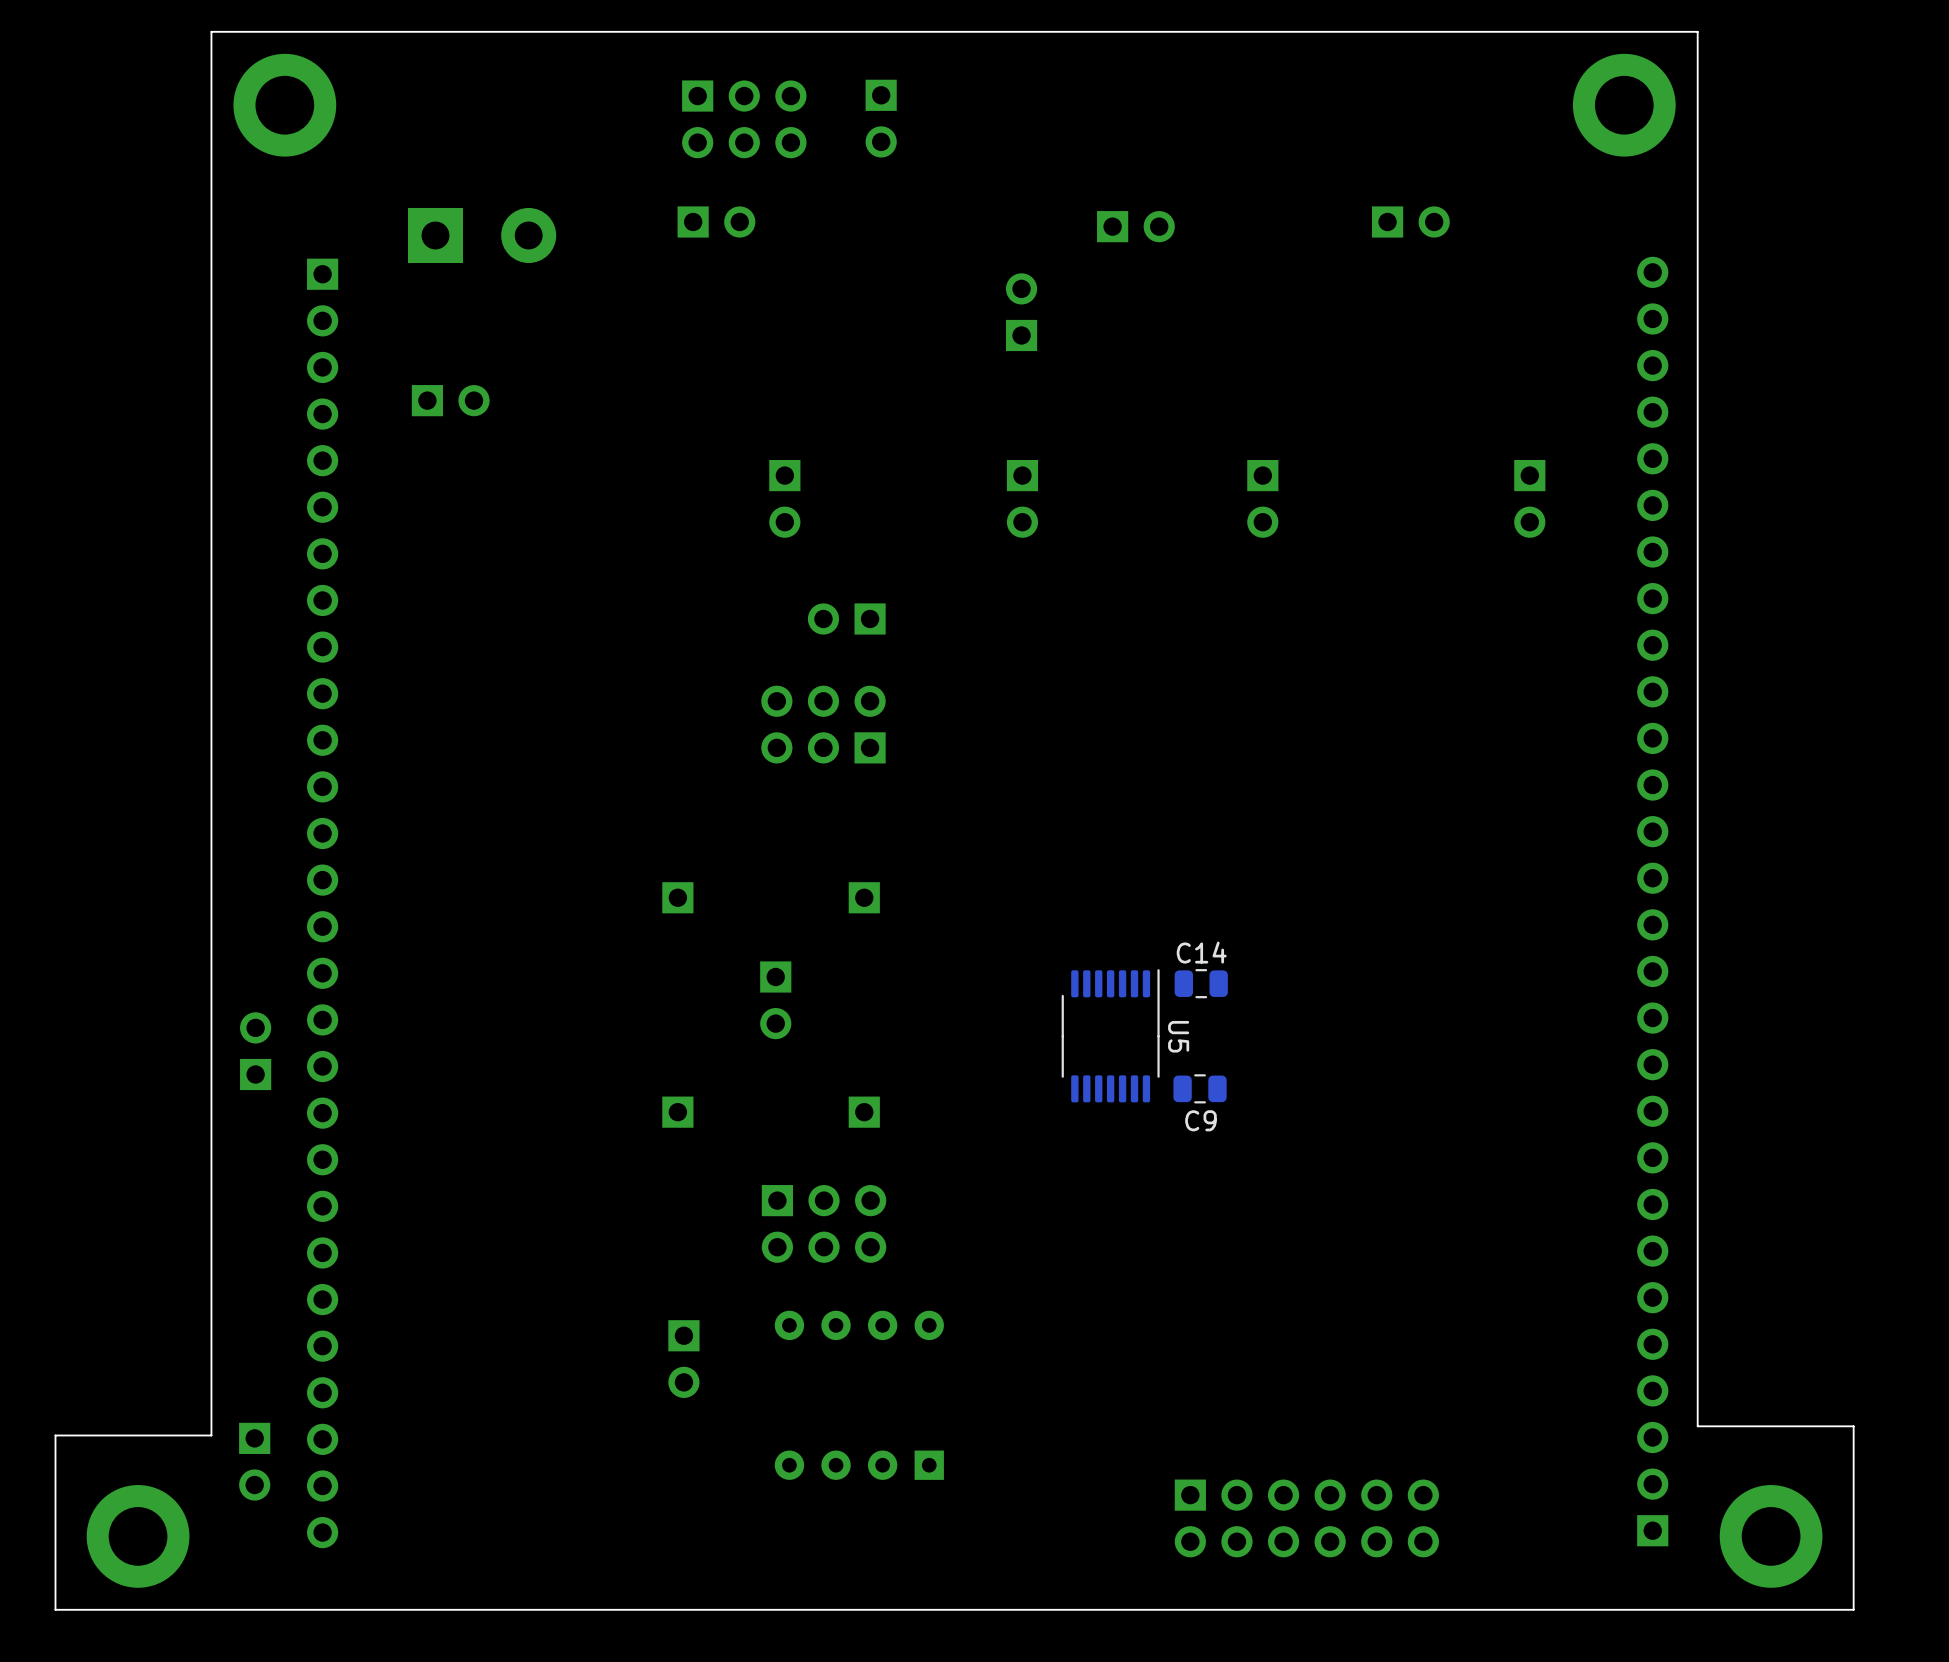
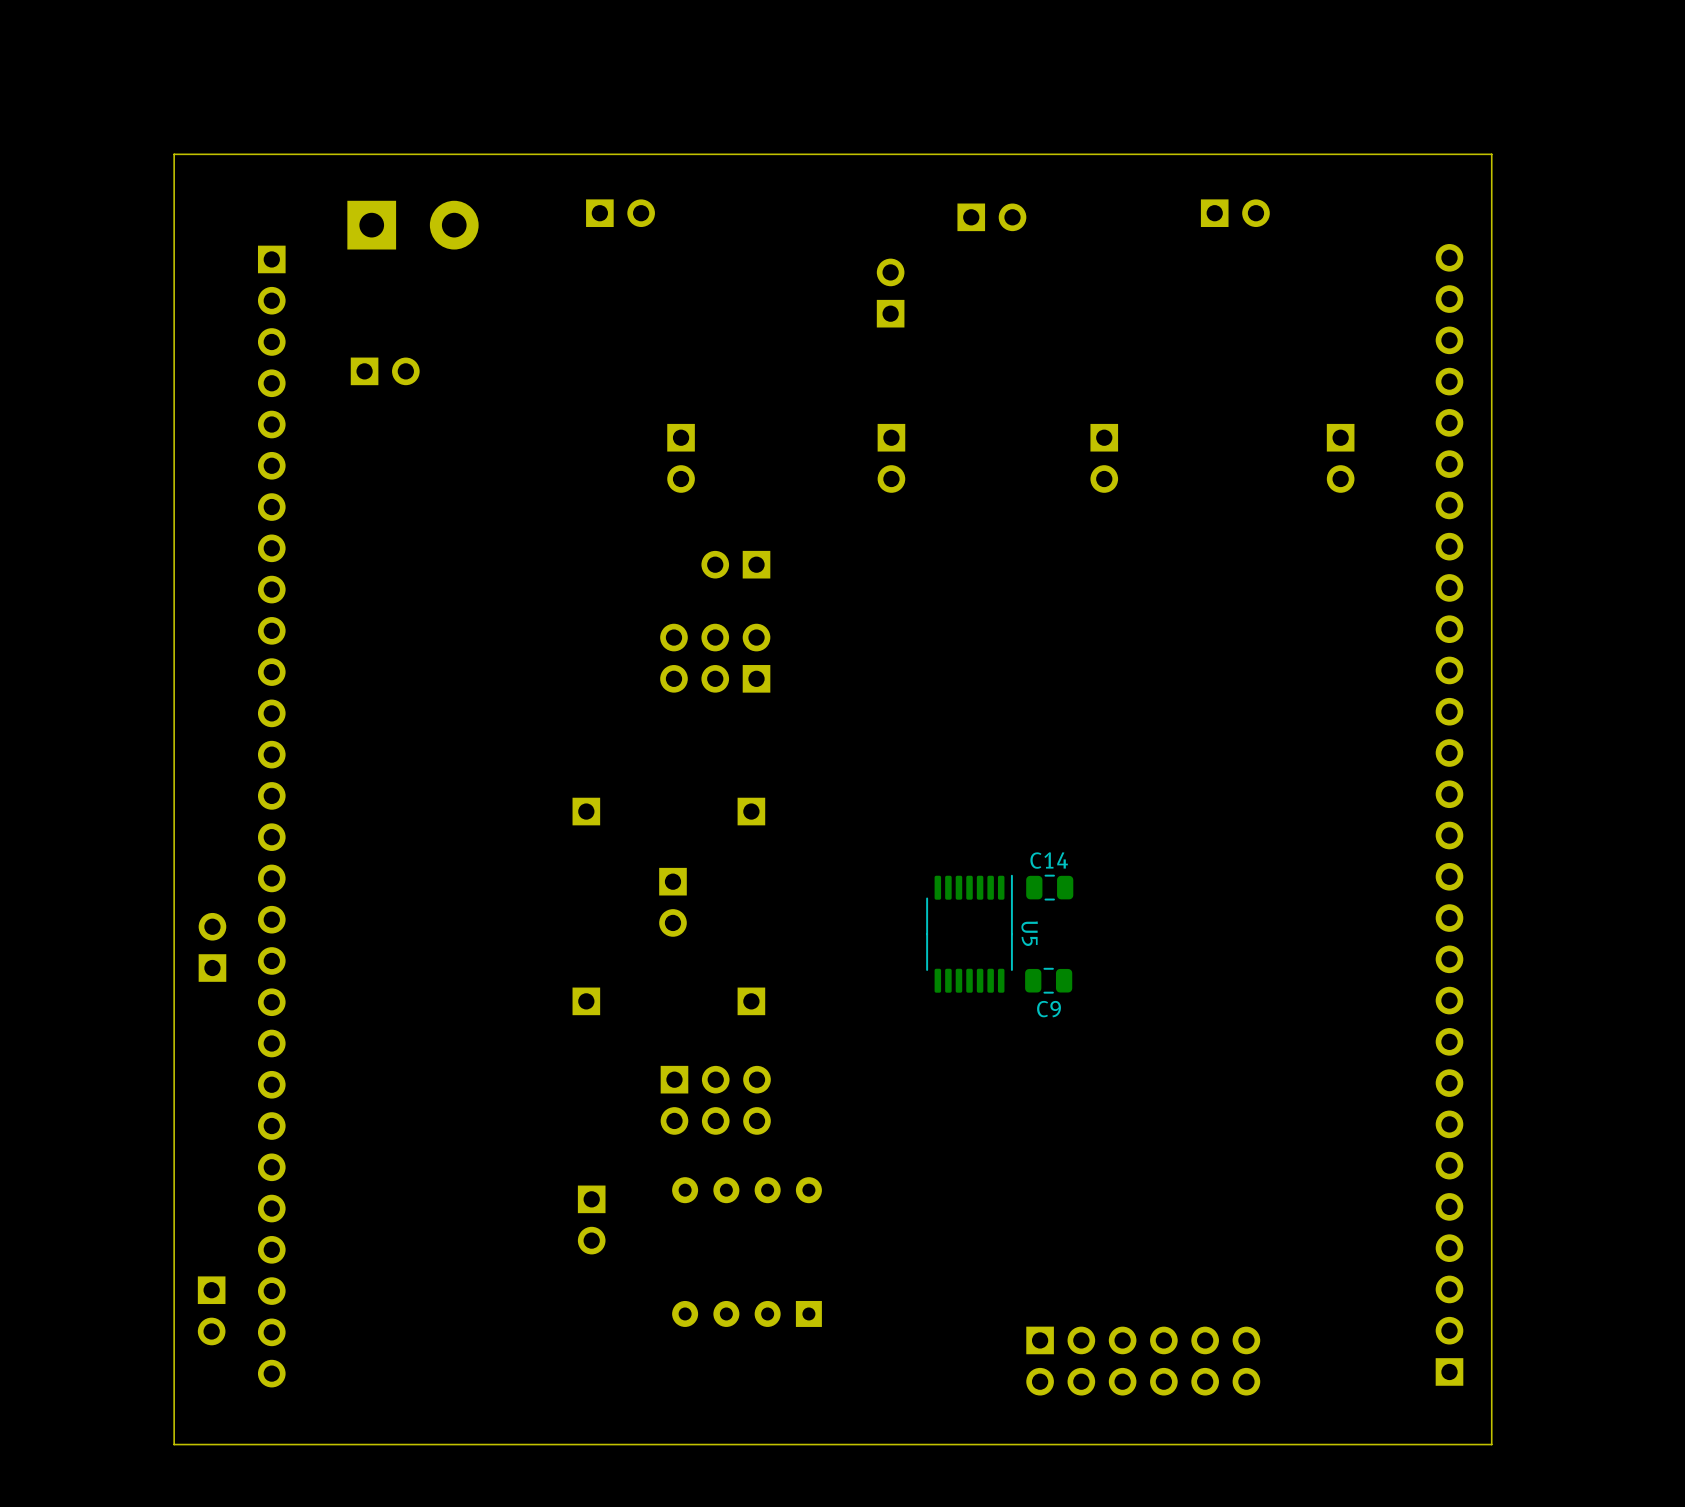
board edge: (1697, 31) (211, 31) (211, 1435) (55, 1435) (55, 1609) (1853, 1609) (1853, 1426) (1697, 1426) (1697, 31) -> (1491, 154) (1491, 1444) (174, 1444) (174, 154) (1491, 154)
part: (284, 105) -> none
part: (1624, 105) -> none
part: (881, 118) -> none
part: (744, 119) -> none
part: (138, 1536) -> none
part: (1771, 1536) -> none

